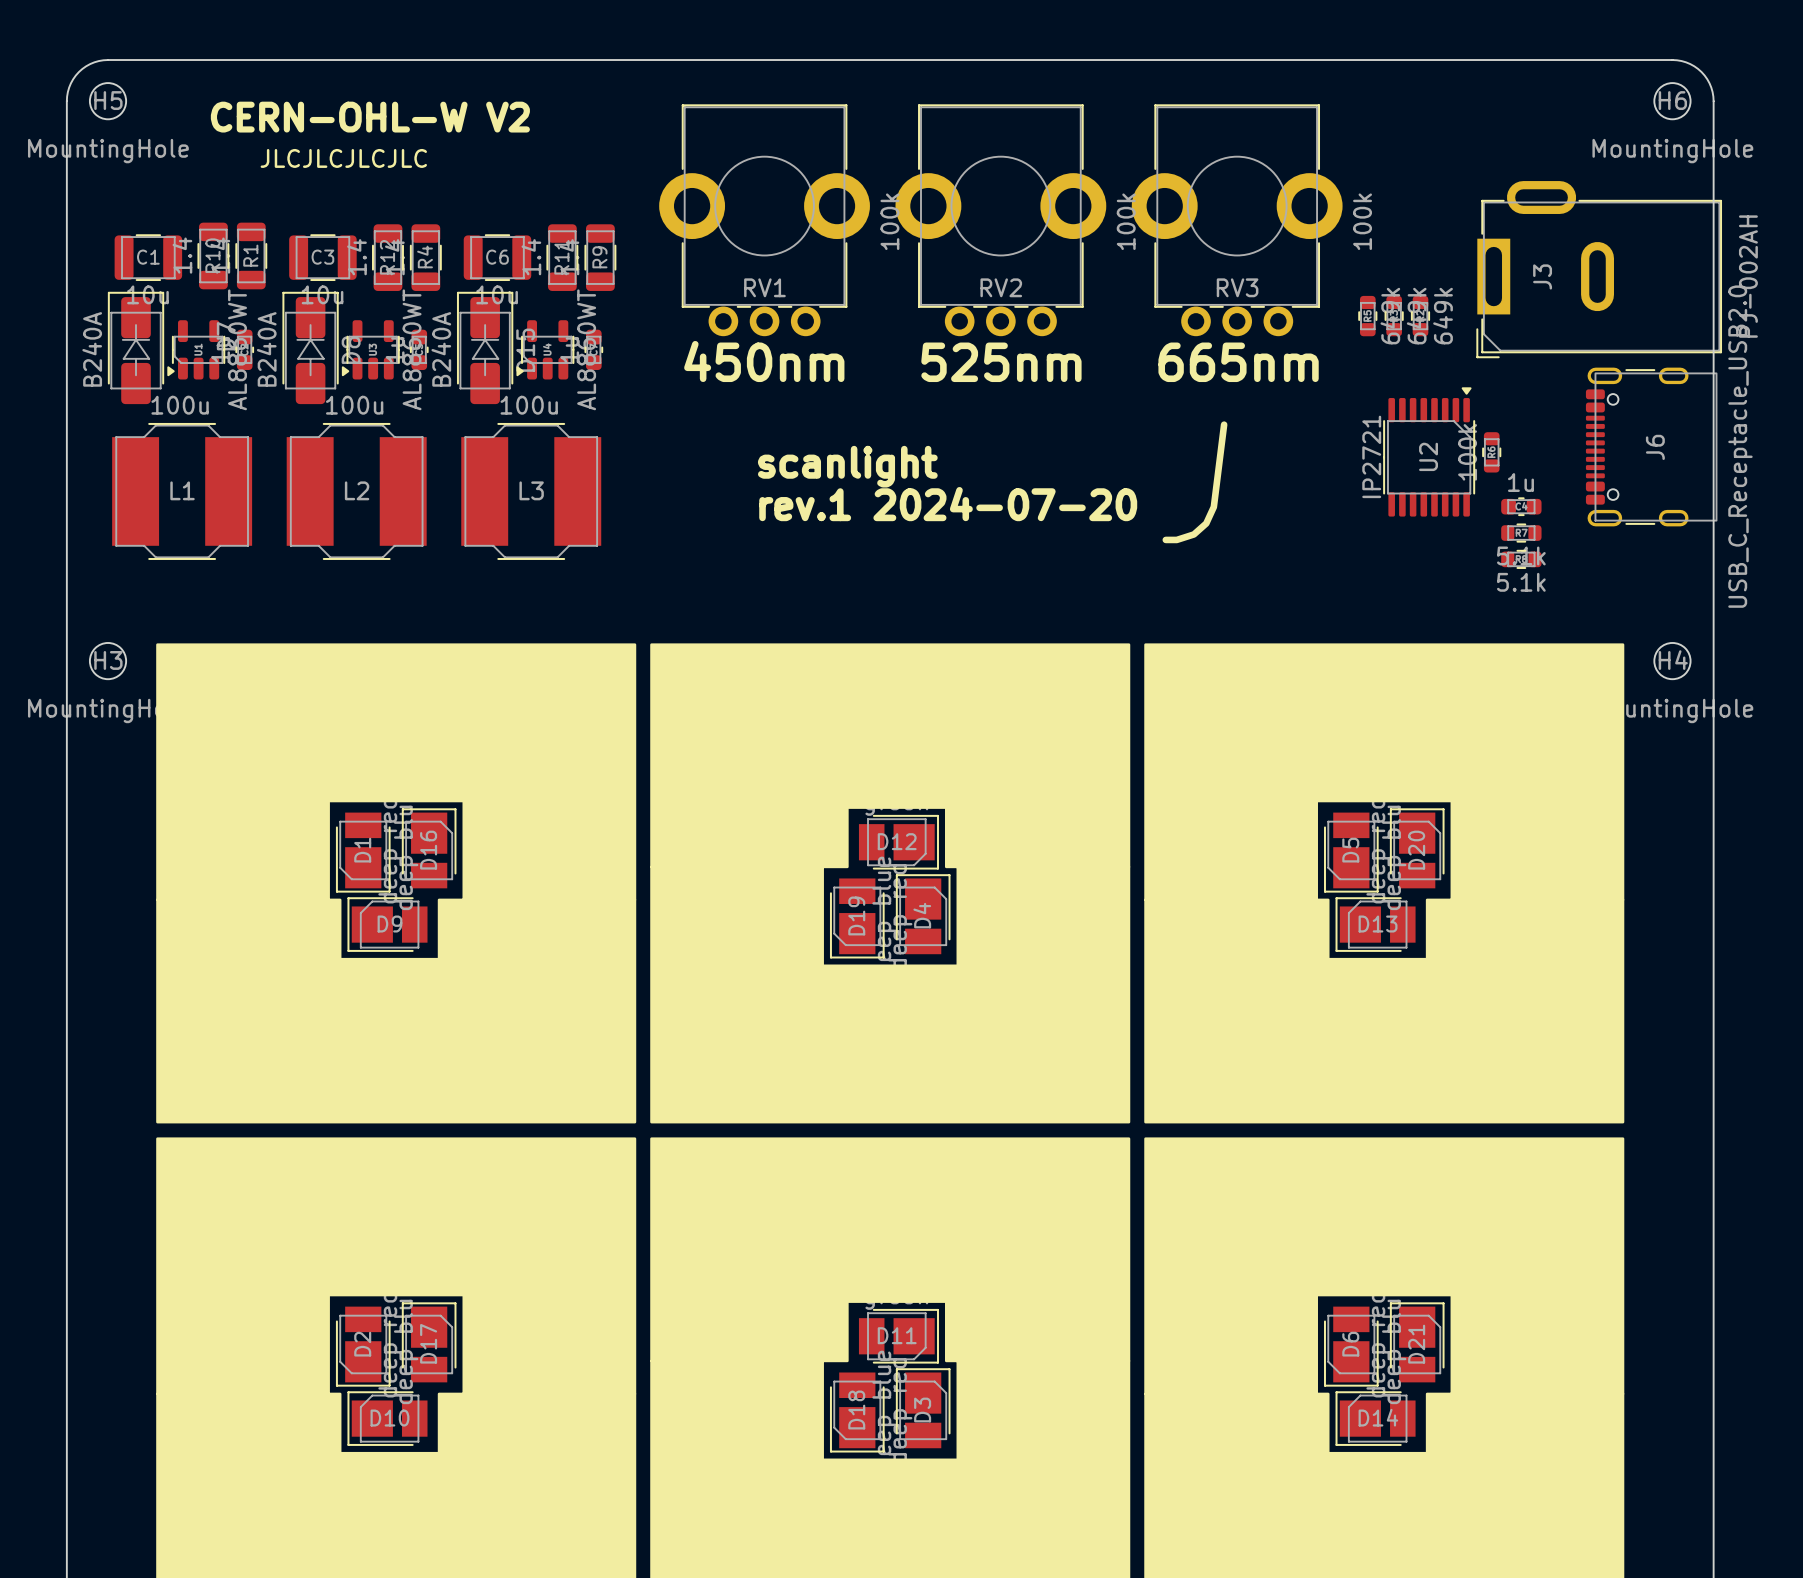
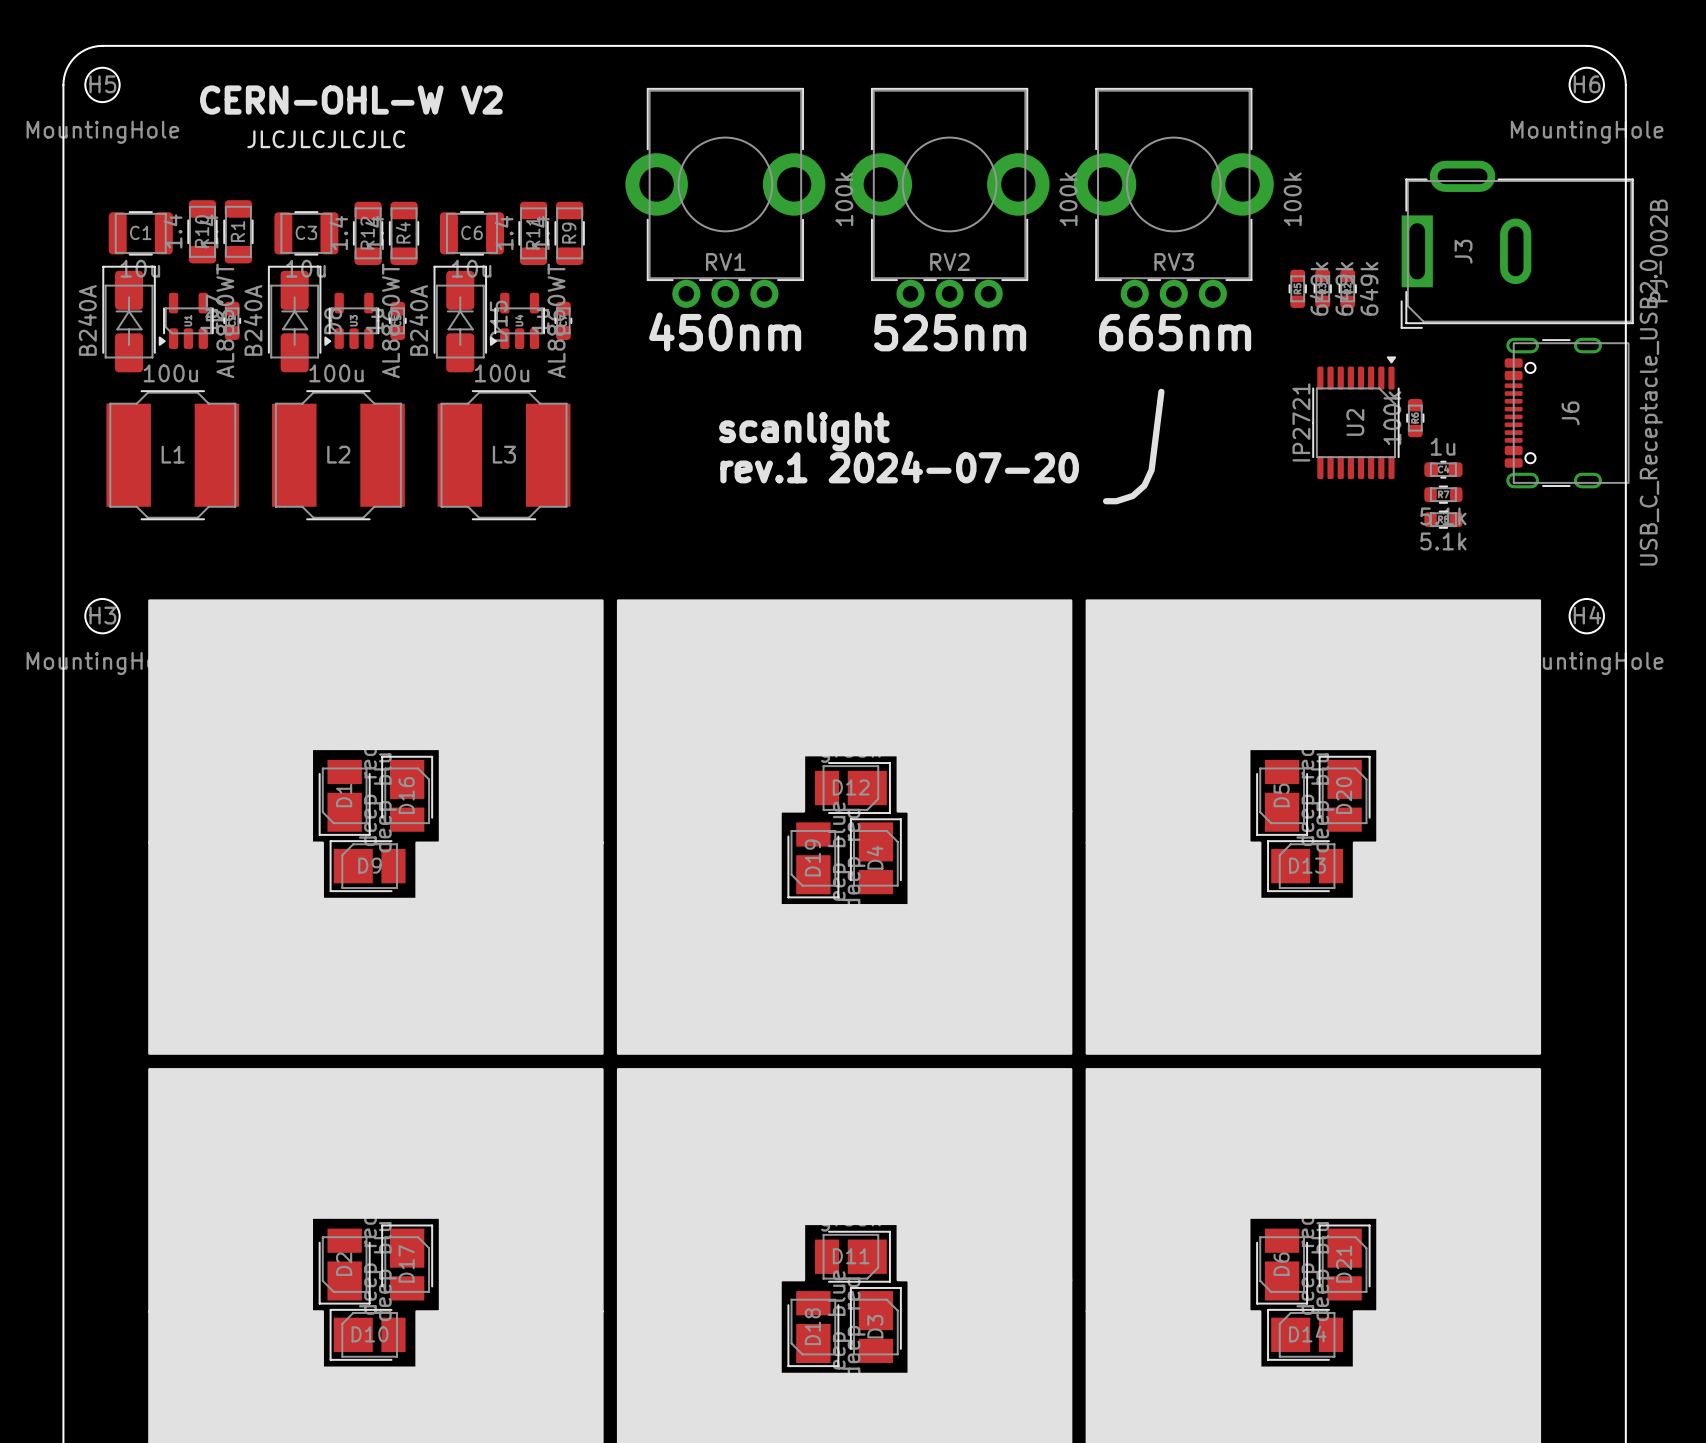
J3 value: PJ-002AH (1748, 276) -> PJ-002B (1658, 250)

